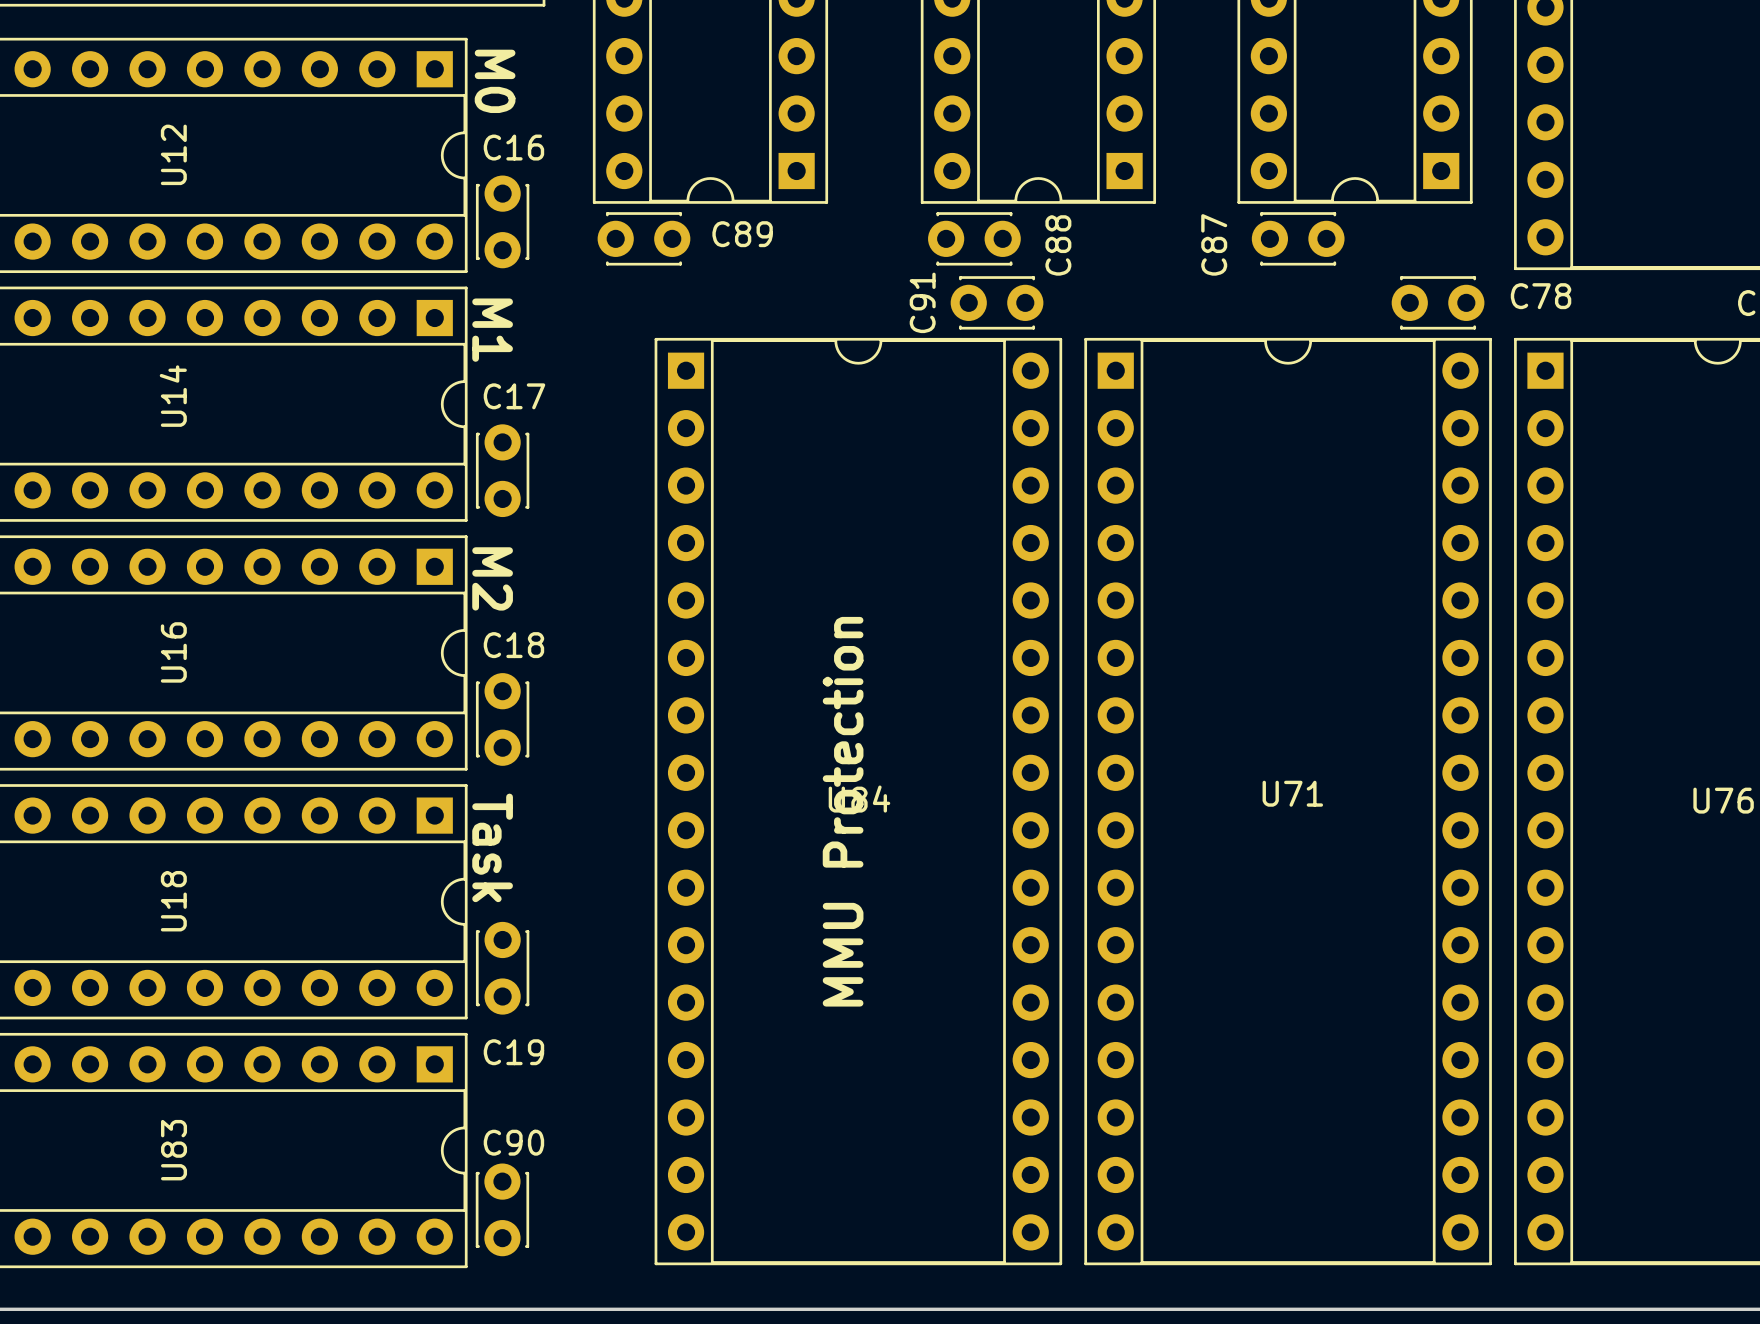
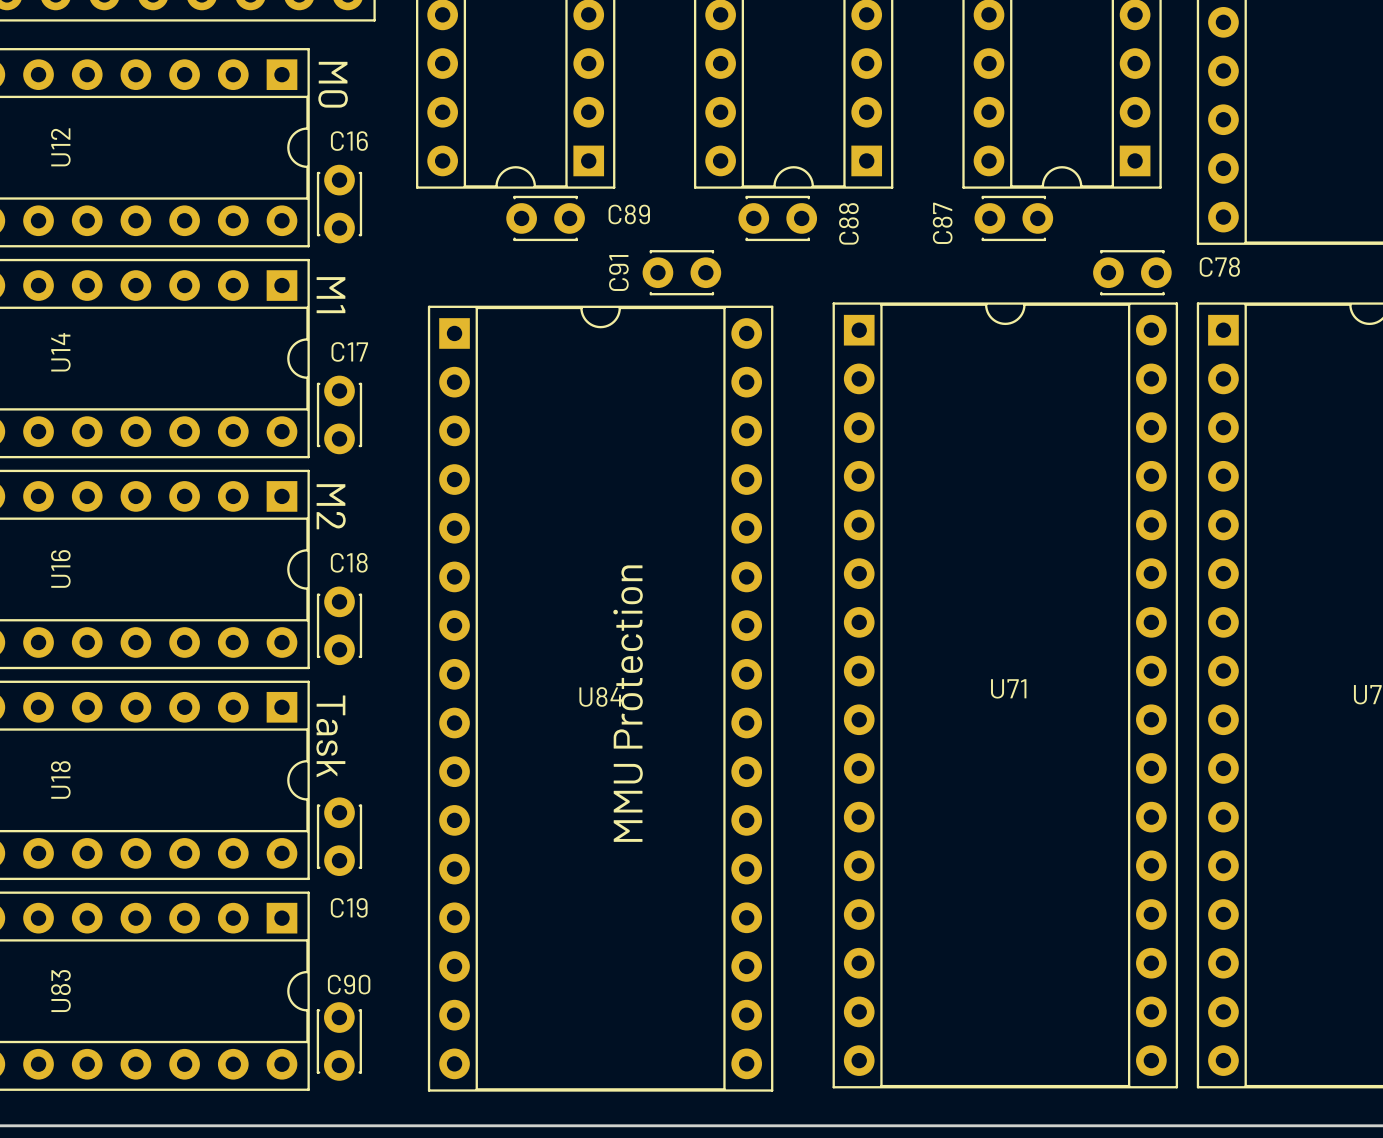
C89 position: (643, 238) -> (545, 218)
C88 position: (974, 238) -> (777, 218)
C91 position: (997, 302) -> (681, 272)
U84 position: (858, 801) -> (600, 698)

